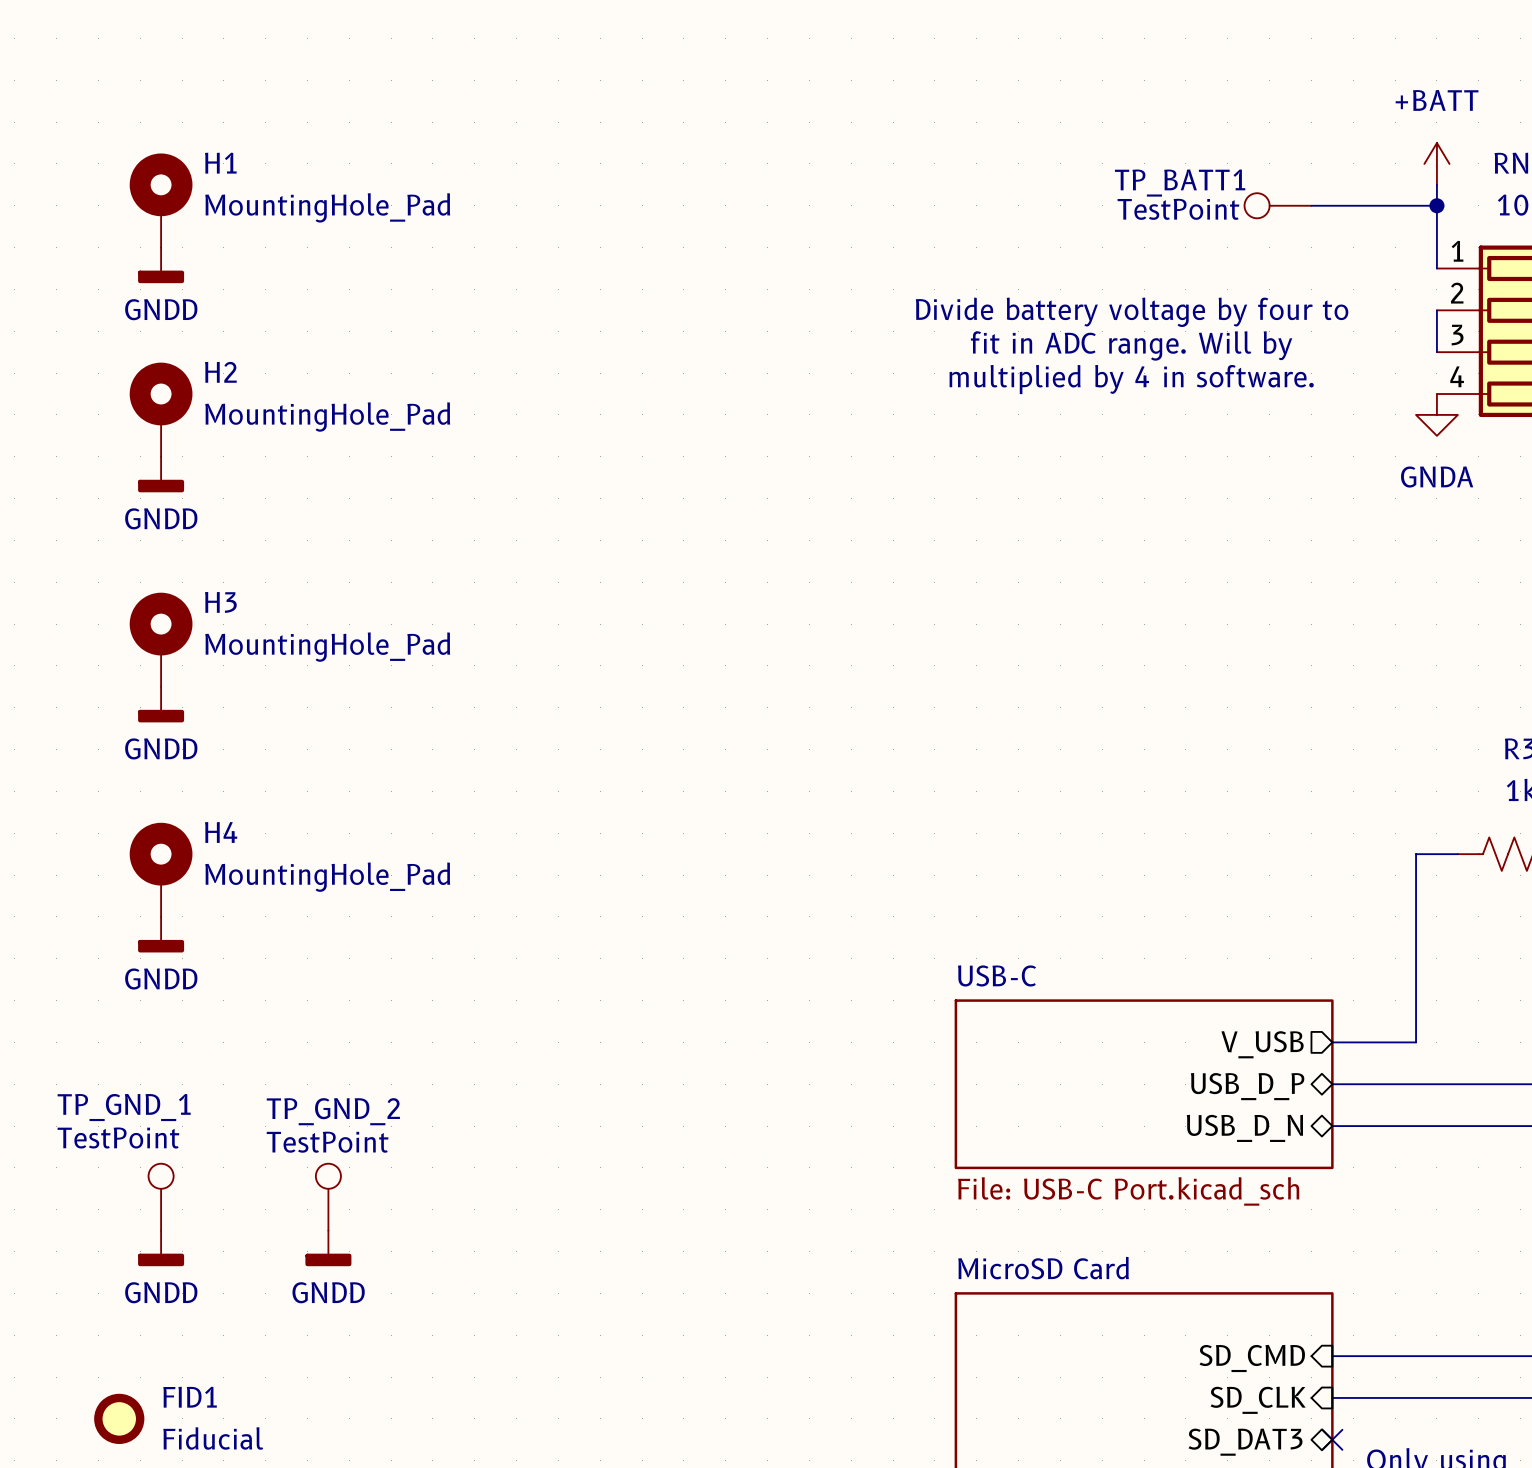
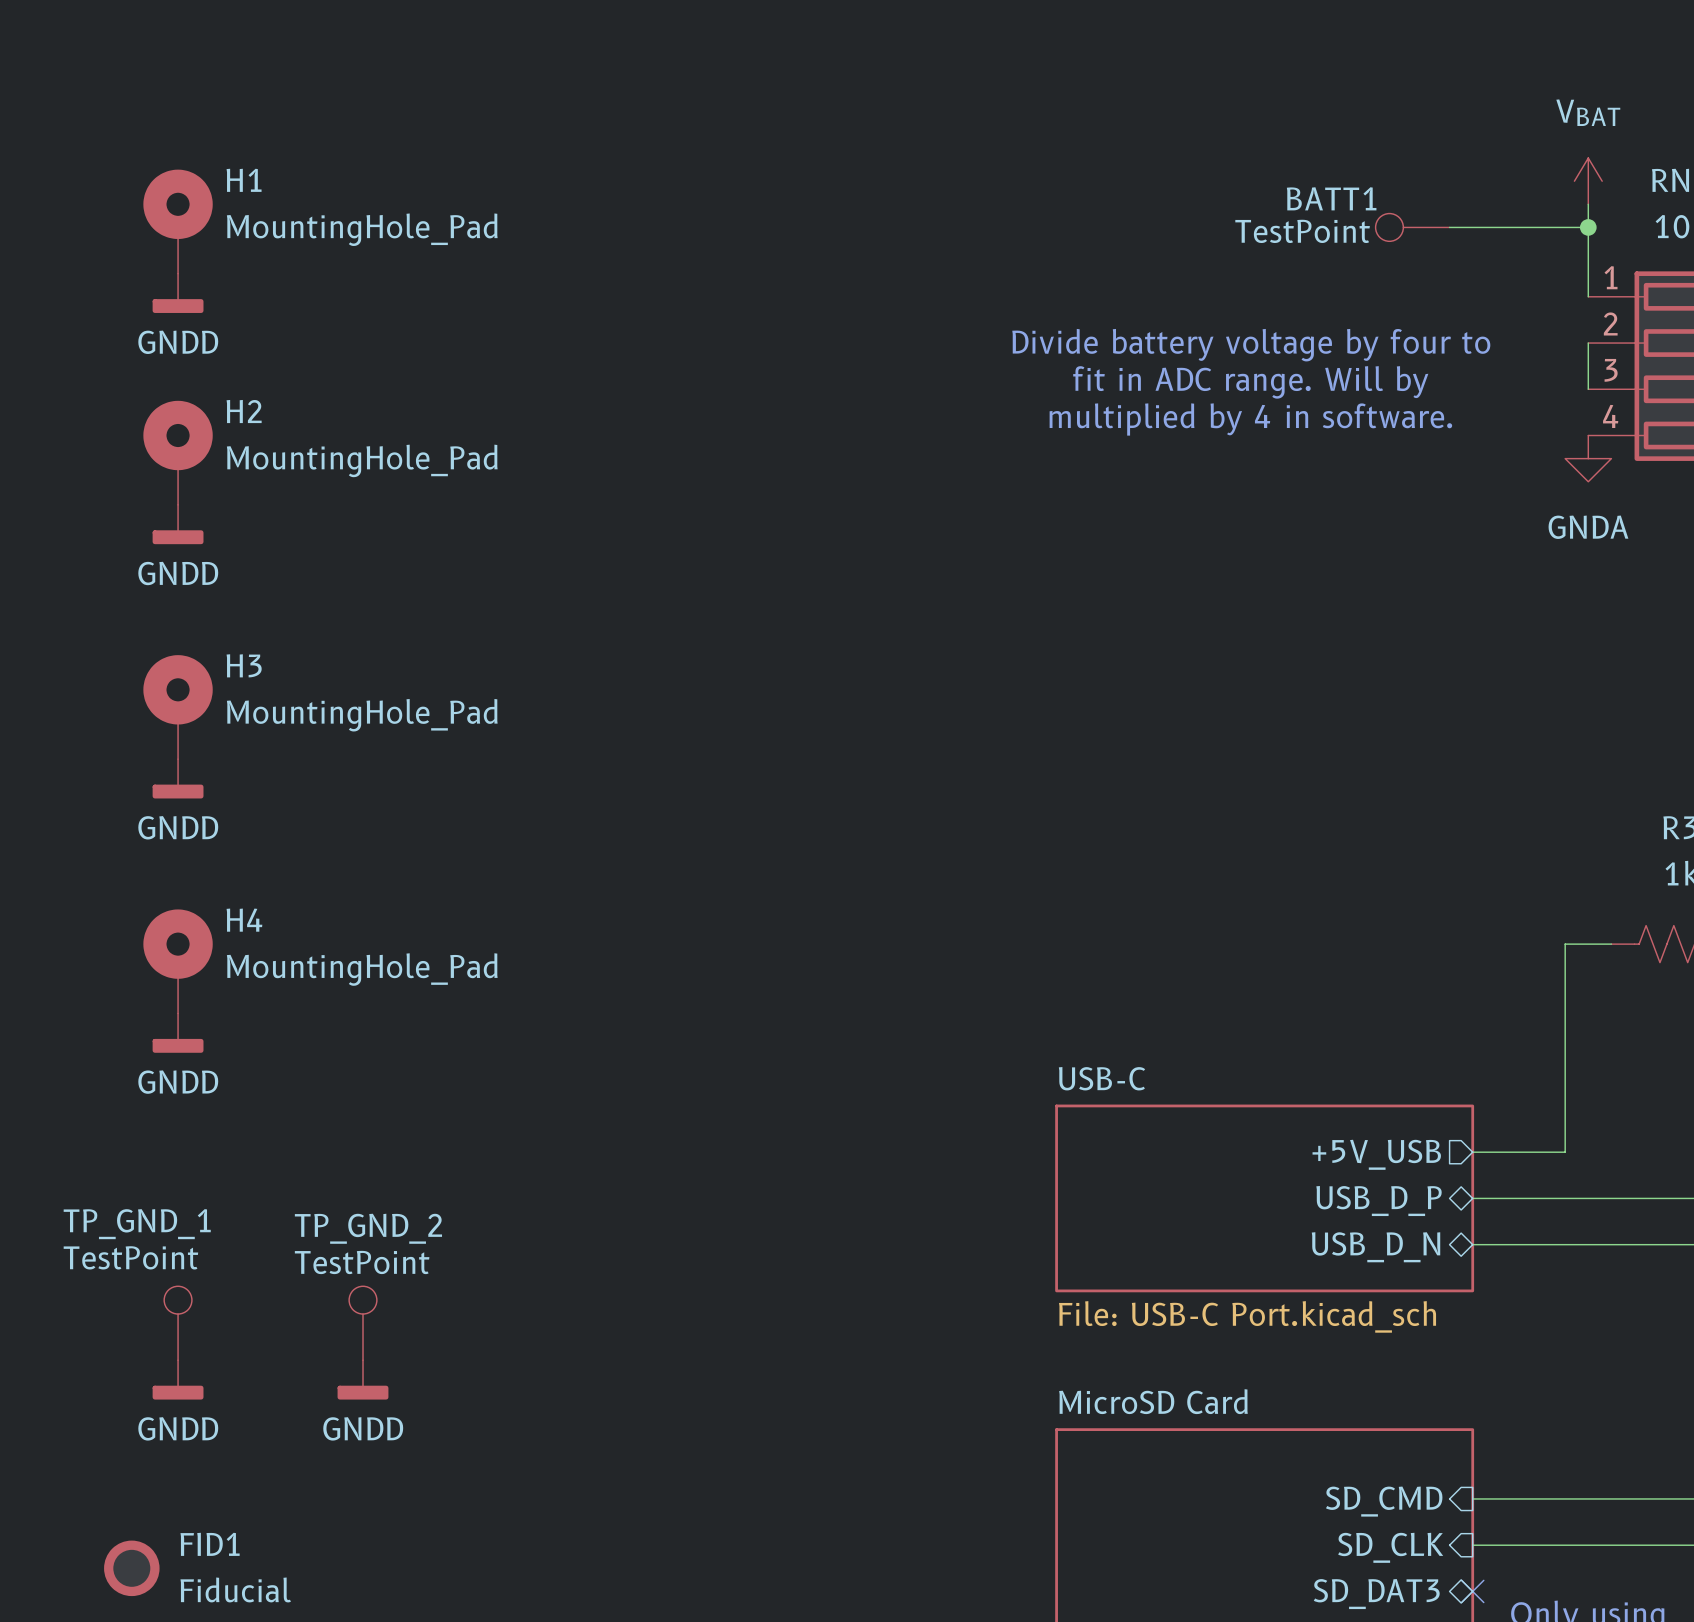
power symbol: +BATT (1436, 163) -> VBAT (1588, 181)
TP_BATT1 name: TP_BATT1 (1180, 183) -> BATT1 (1331, 198)
sheet pin: V_USB (1262, 1044) -> +5V_USB (1376, 1154)

